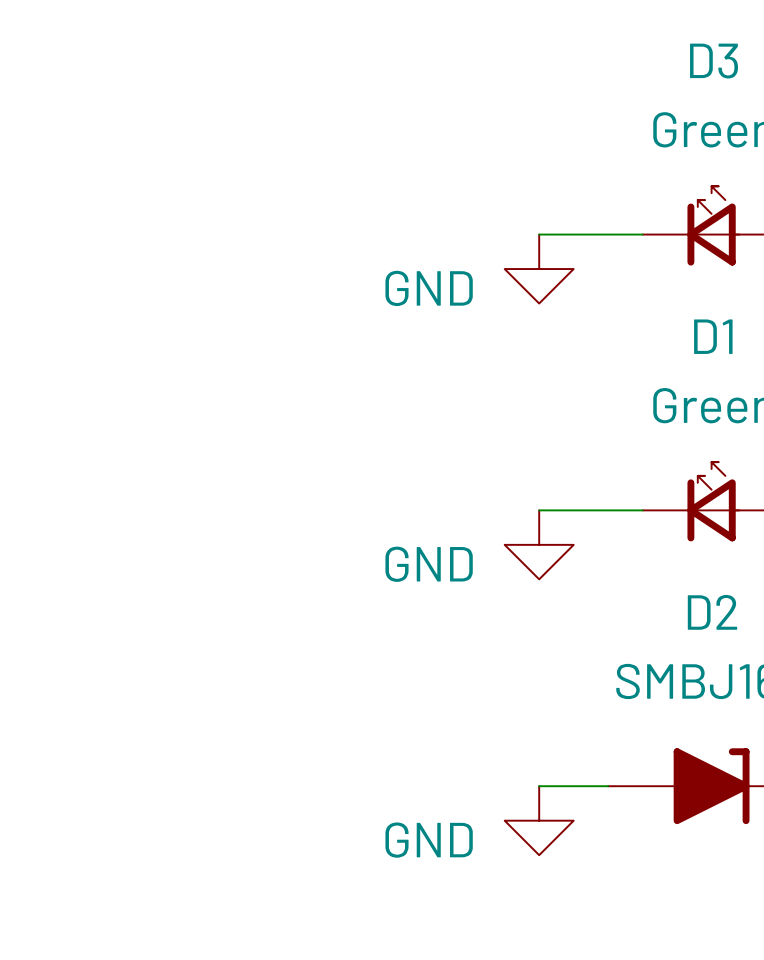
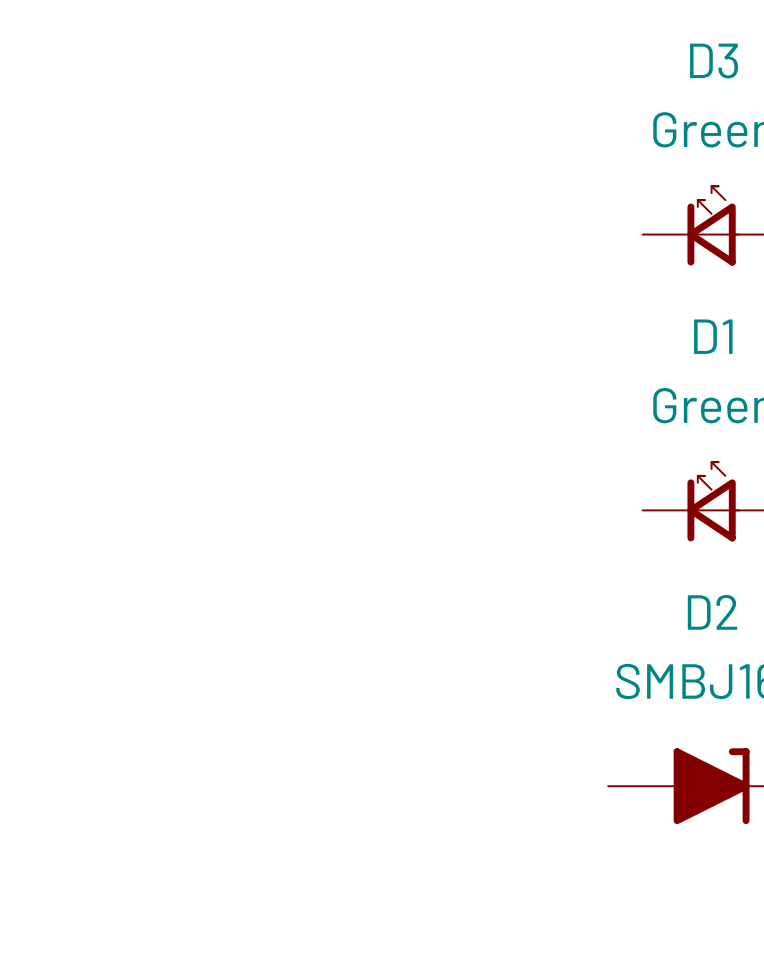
wire: (539, 234) (642, 234) -> none
power symbol: GND (539, 269) -> none
wire: (539, 510) (642, 510) -> none
power symbol: GND (539, 544) -> none
wire: (539, 786) (608, 786) -> none
power symbol: GND (539, 820) -> none

